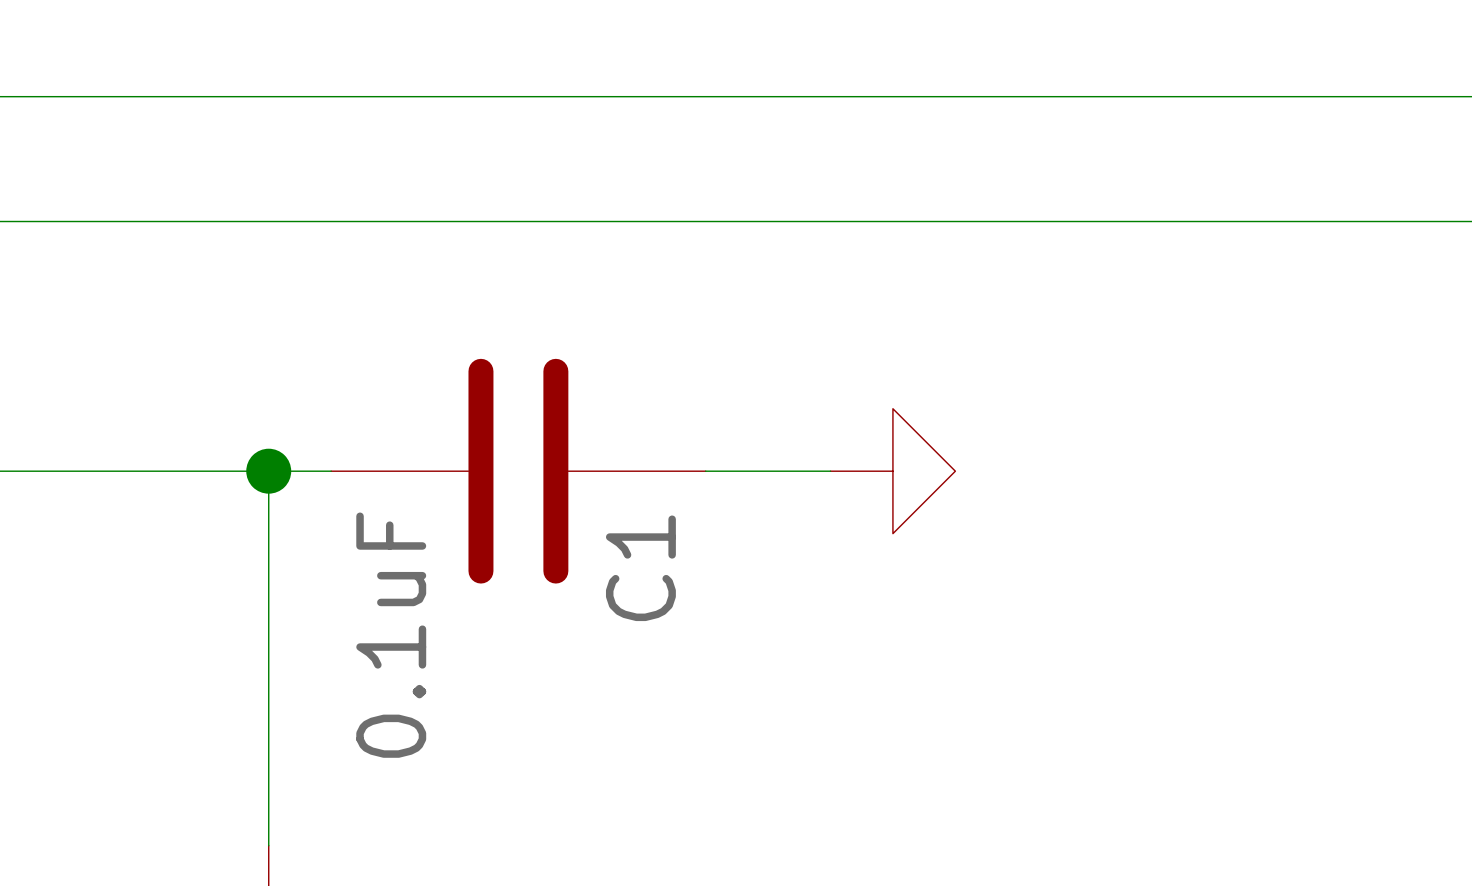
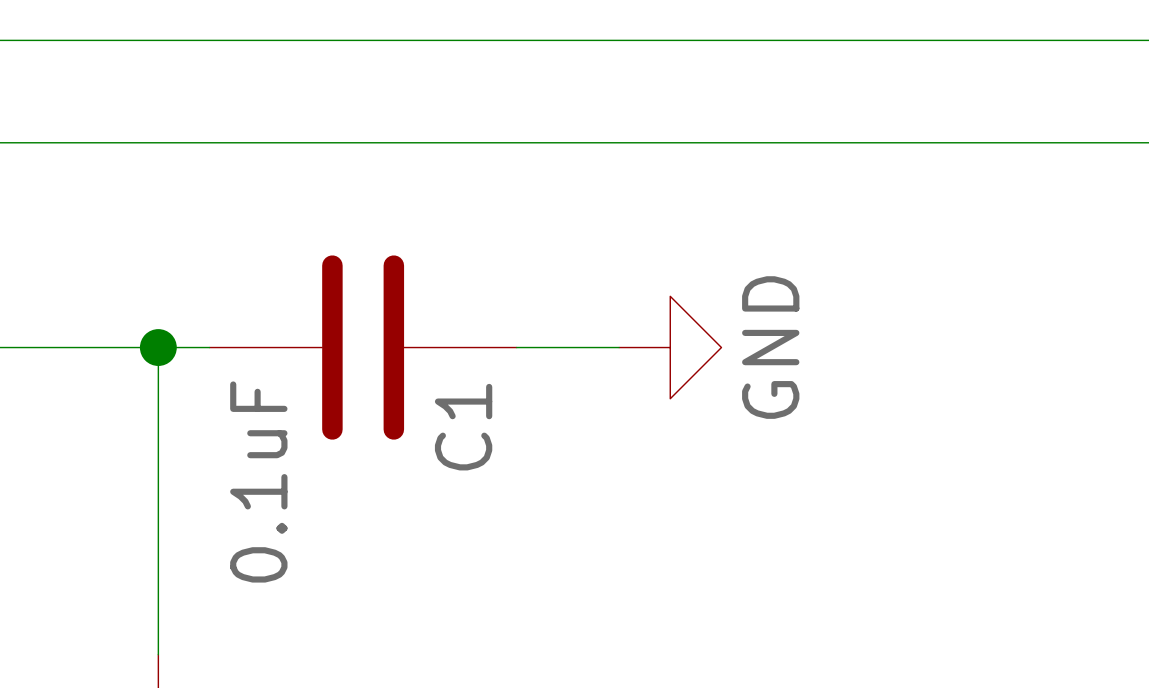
power symbol text: none -> GND (770, 347)

